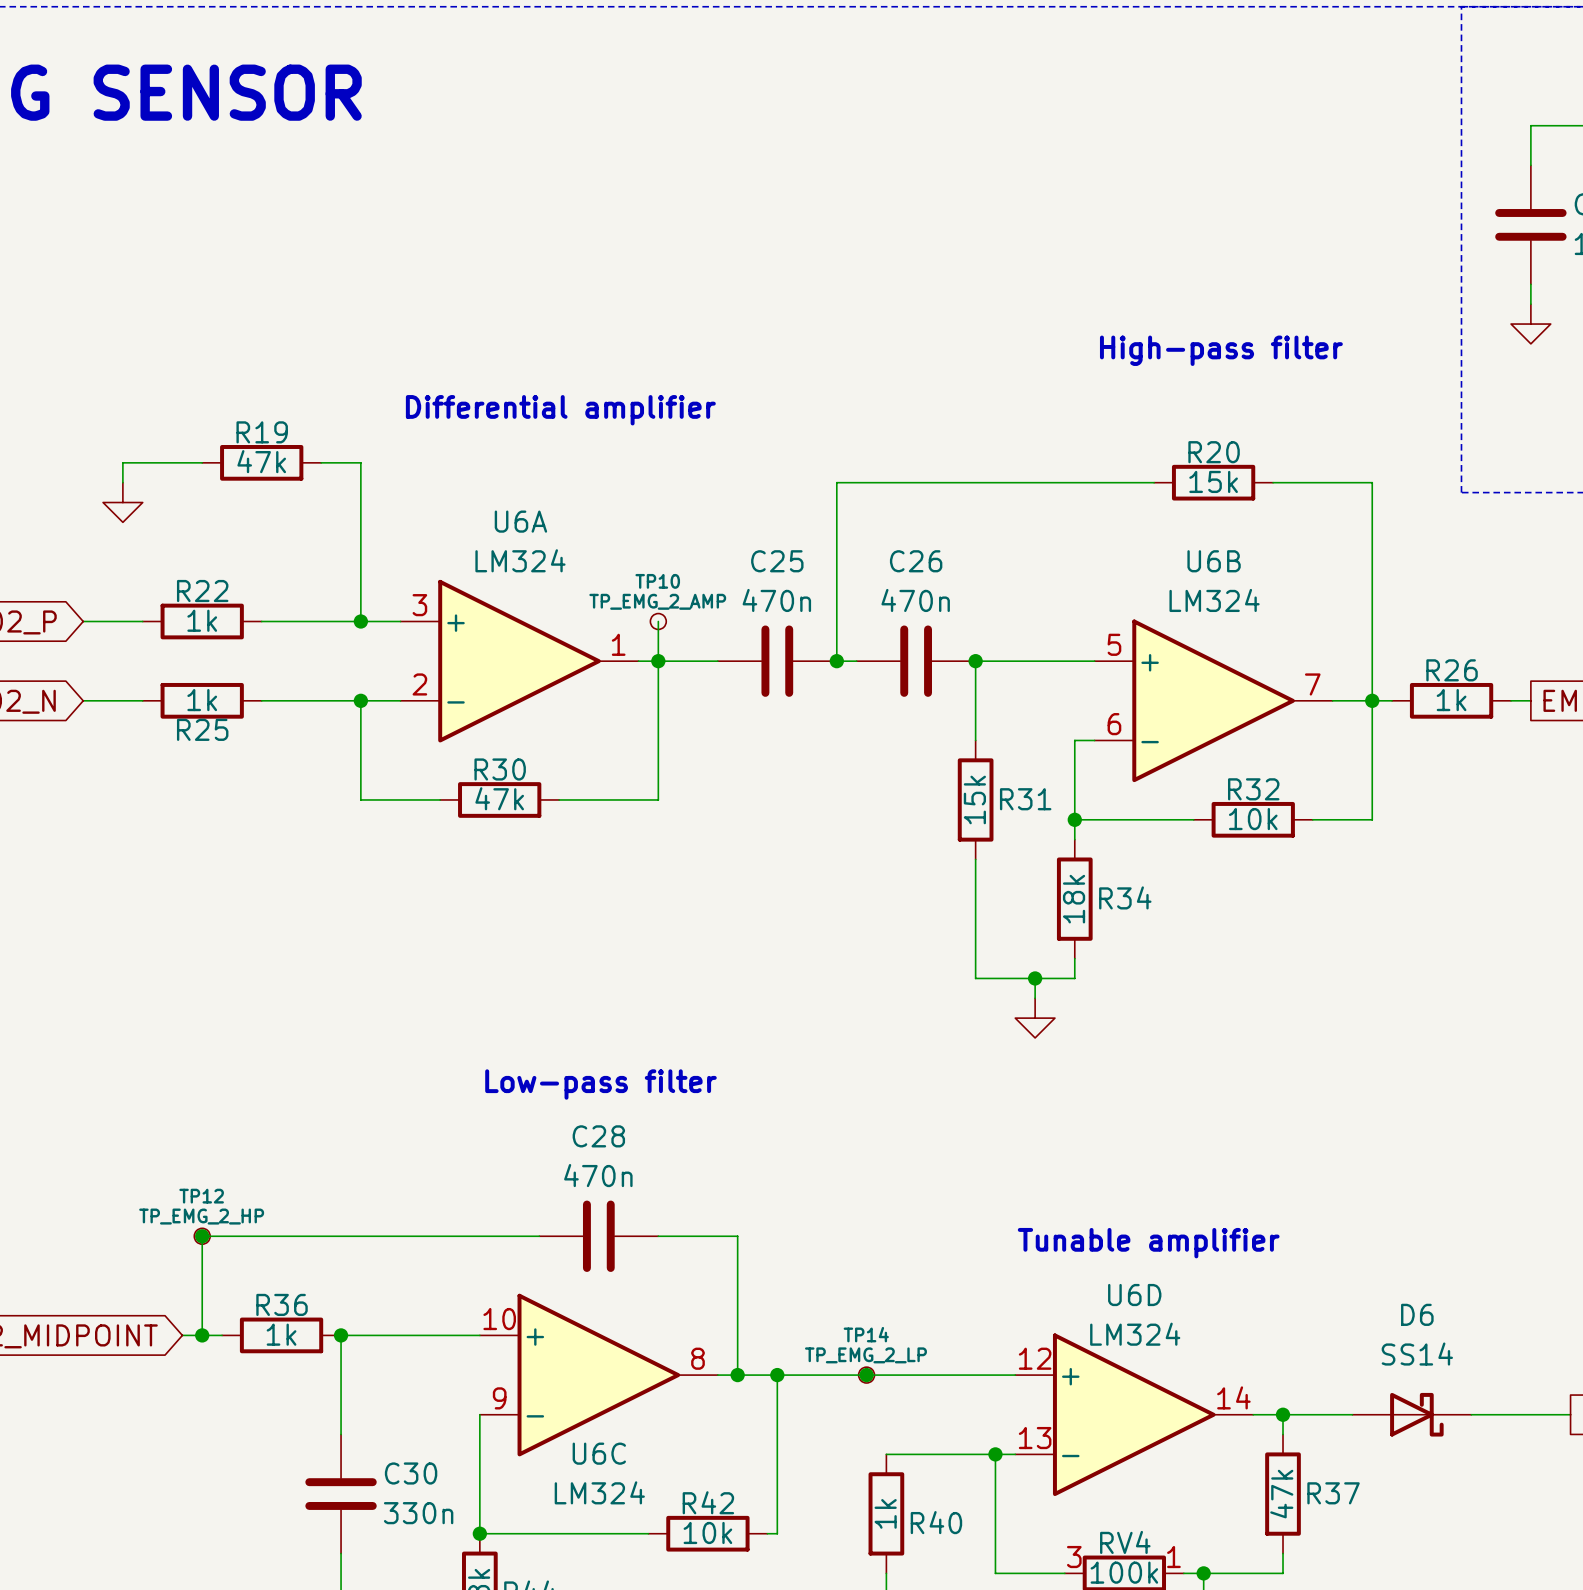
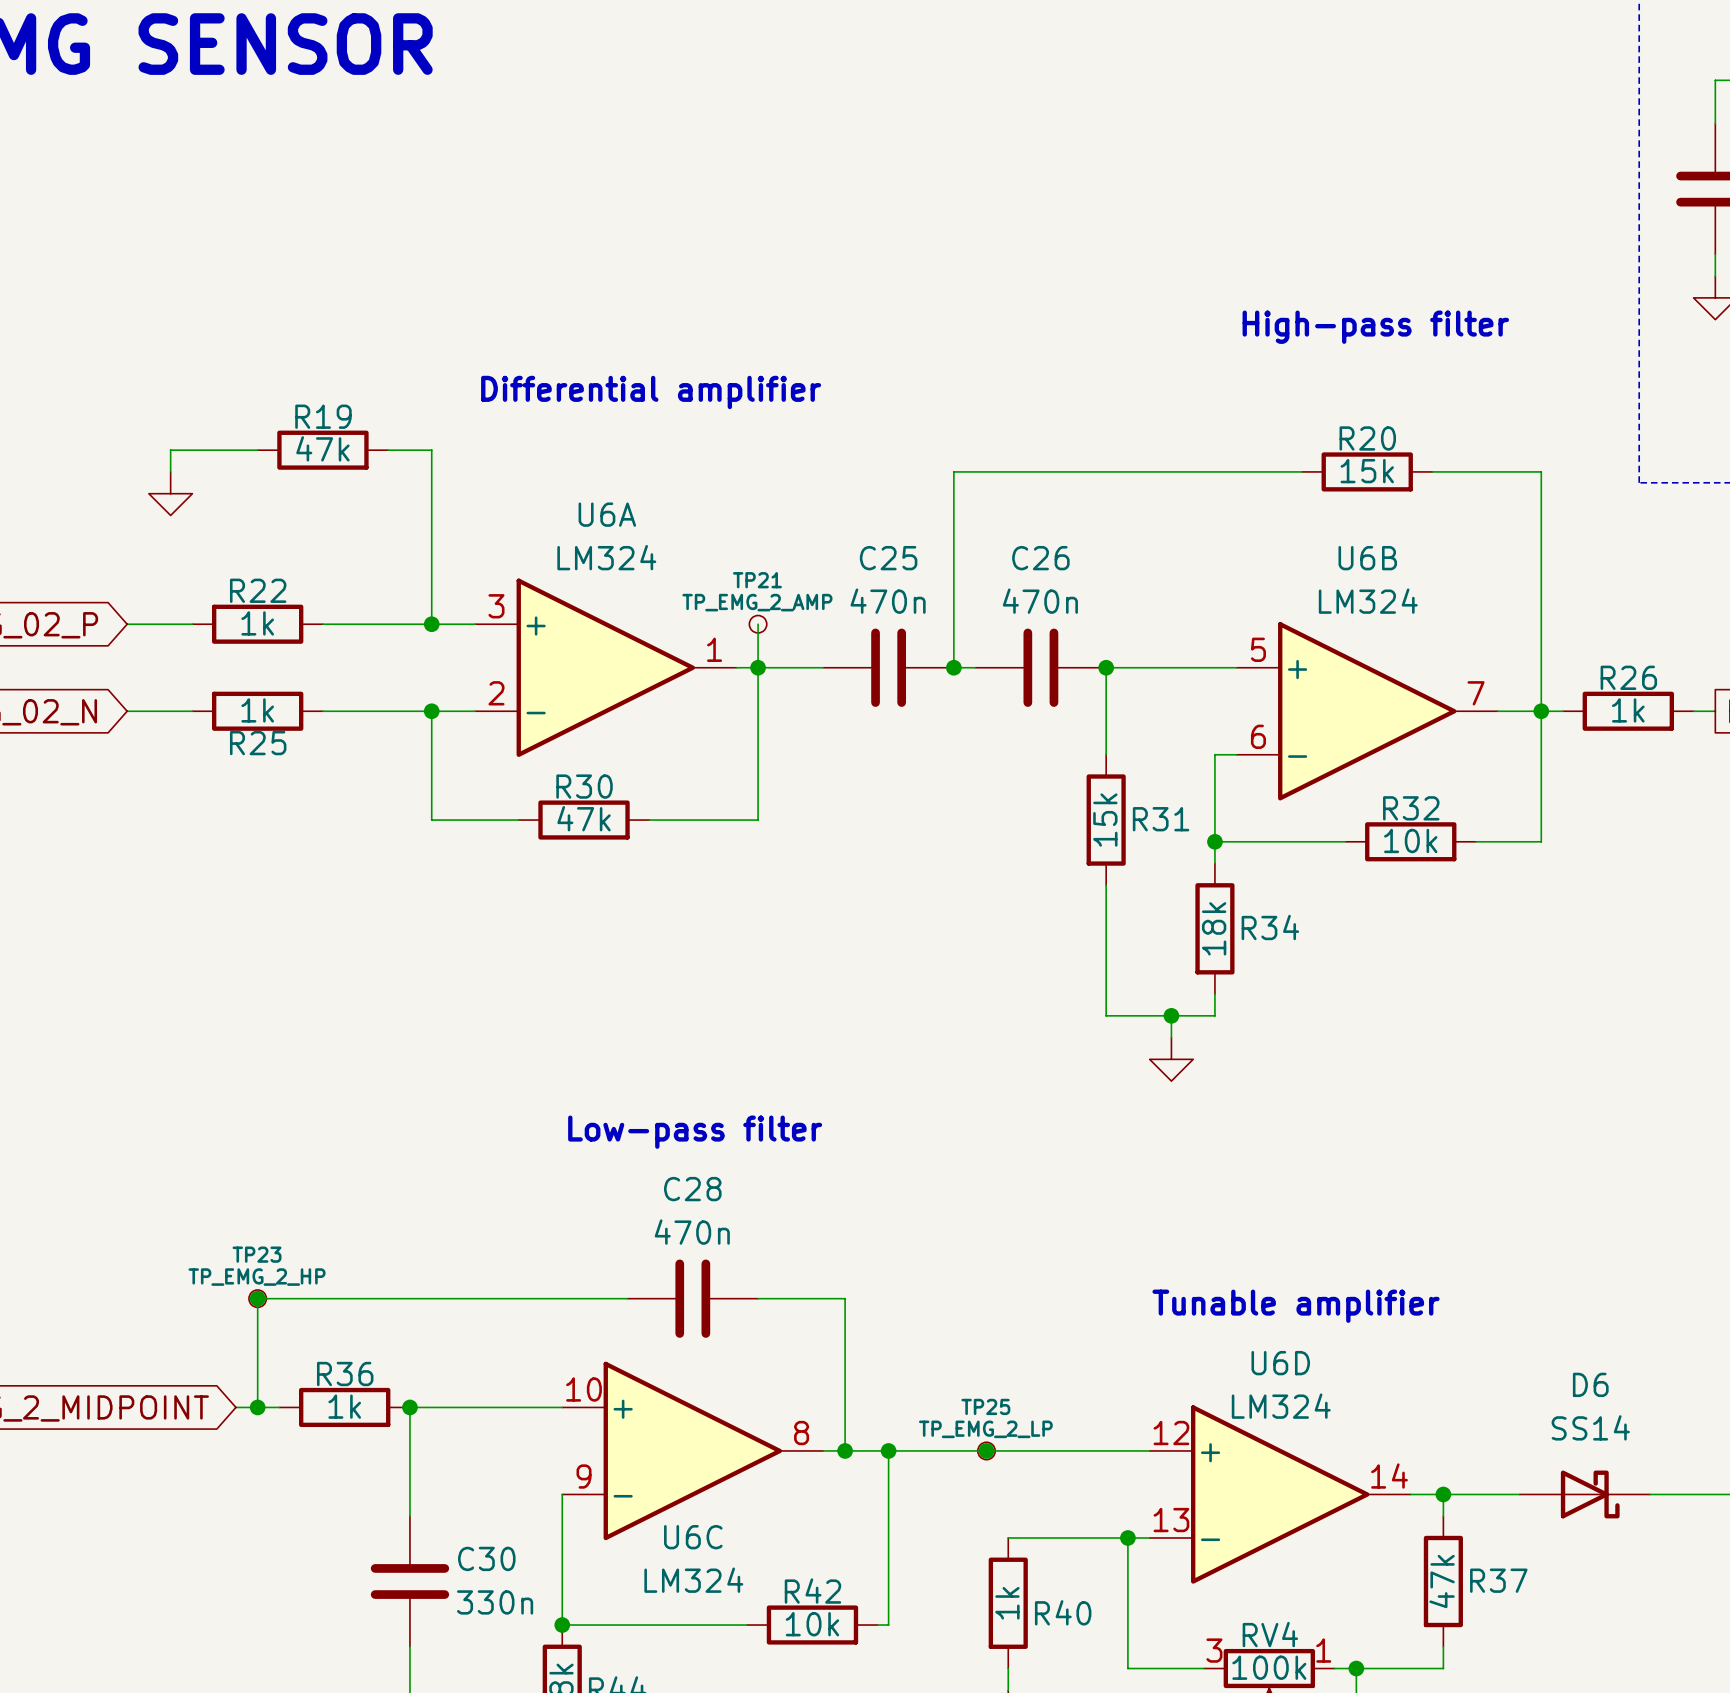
TP10 name: TP10 (657, 581) -> TP21 (757, 580)
TP12 name: TP12 (201, 1196) -> TP23 (257, 1254)
TP14 name: TP14 (866, 1334) -> TP25 (985, 1406)

